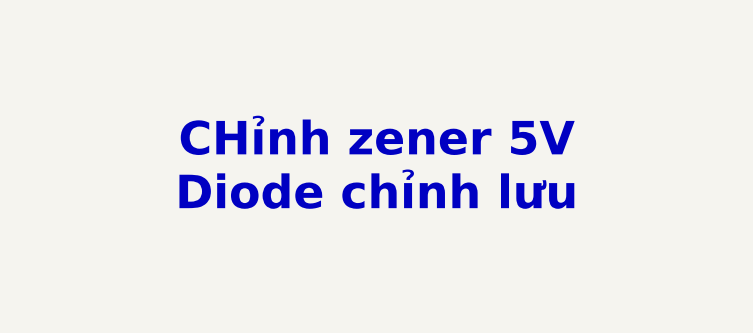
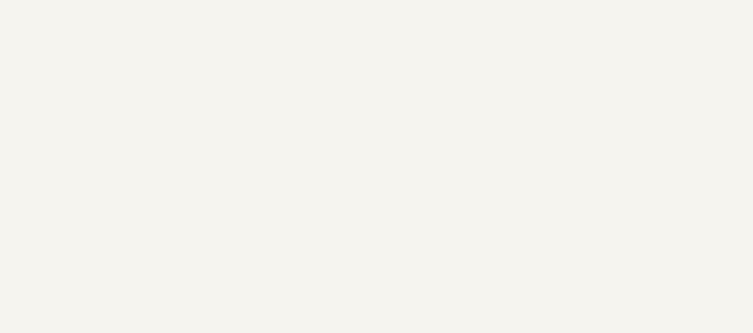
text: CHỉnh zener 5V (377, 135) -> none
text: Diode chỉnh lưu (376, 189) -> none

